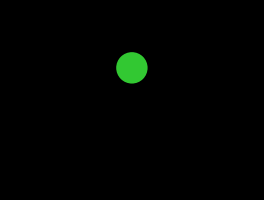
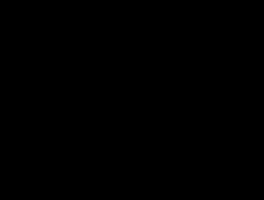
junction: (131, 67) -> none

